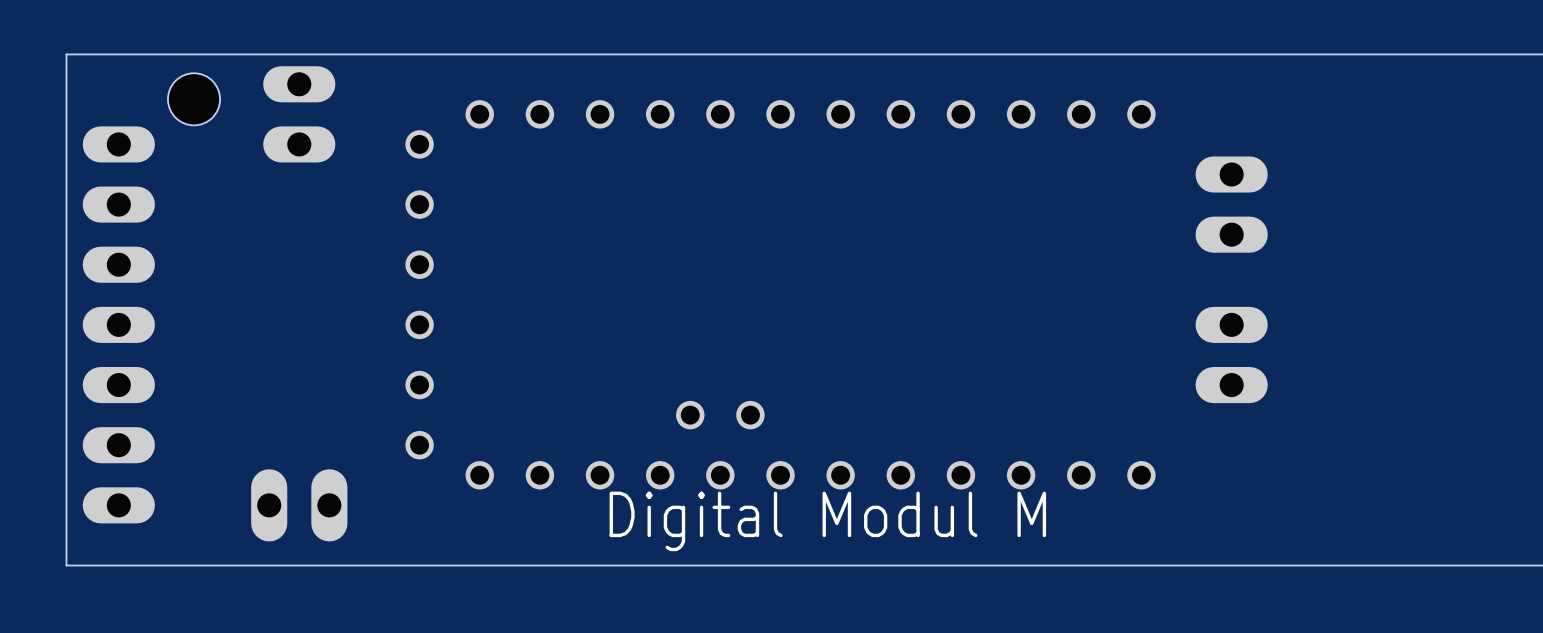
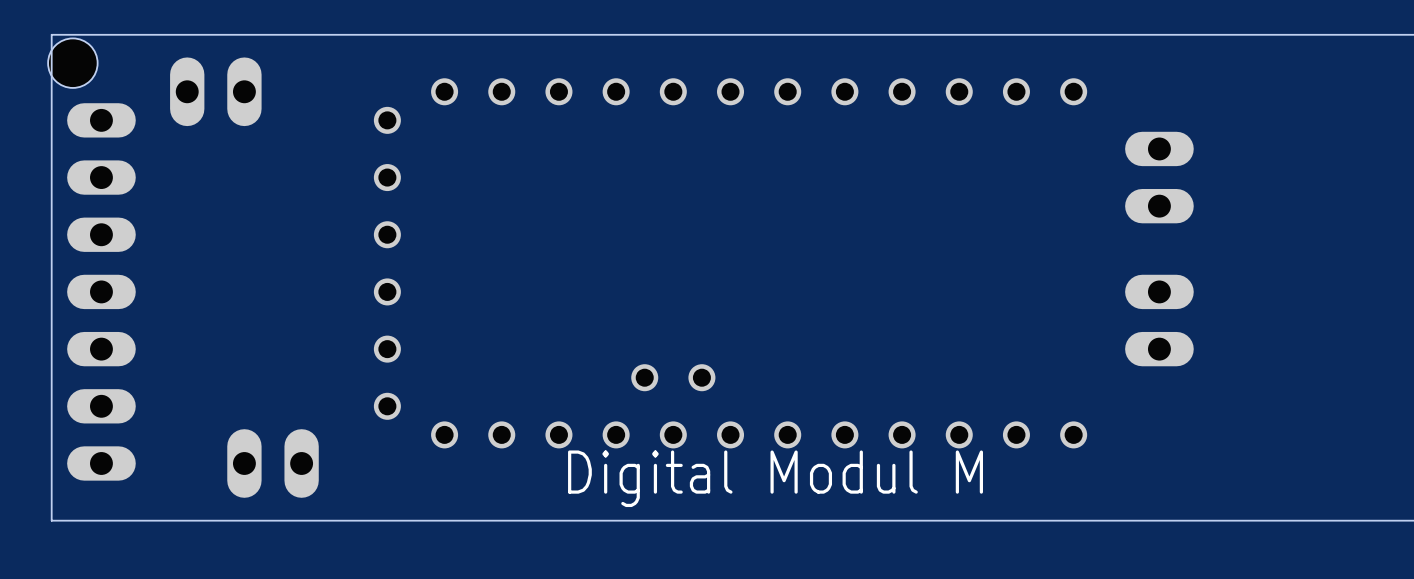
hole position: (194, 99) -> (72, 63)
part rotation: 0° (299, 114) -> 90° clockwise (215, 91)
part position: (299, 114) -> (215, 91)

